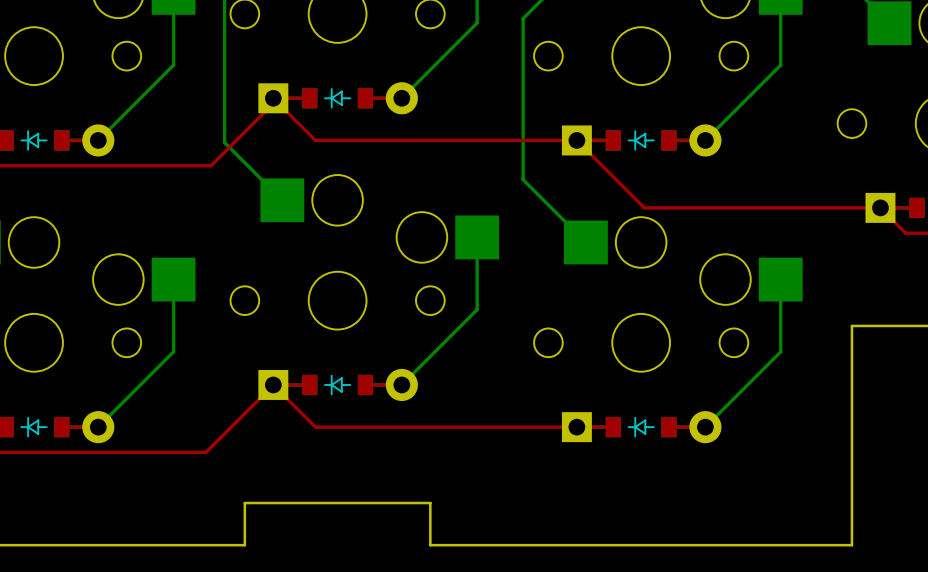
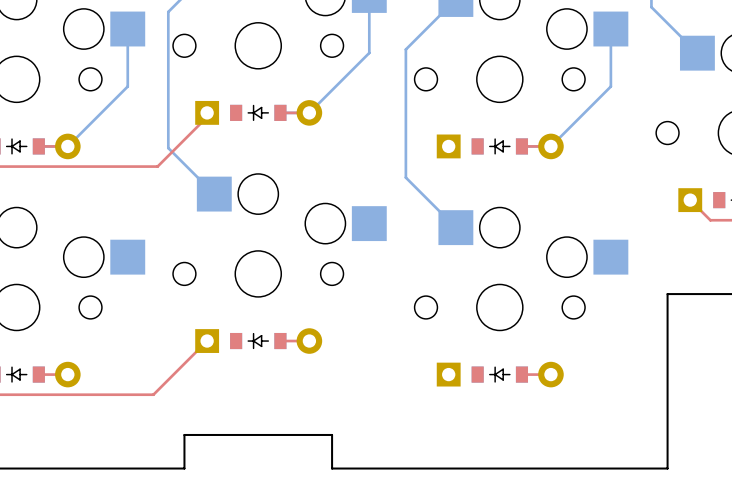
top track: (309, 98) (273, 98) (315, 140) (613, 140) -> none
top track: (576, 140) (644, 207) (916, 207) -> none
bottom track: (477, 237) (477, 309) (401, 384) (365, 384) -> none
bottom track: (173, 279) (173, 351) (98, 427) (61, 427) -> none
bottom track: (780, 279) (780, 351) (705, 427) (668, 427) -> none
top track: (309, 384) (273, 384) (315, 427) (613, 427) -> none

